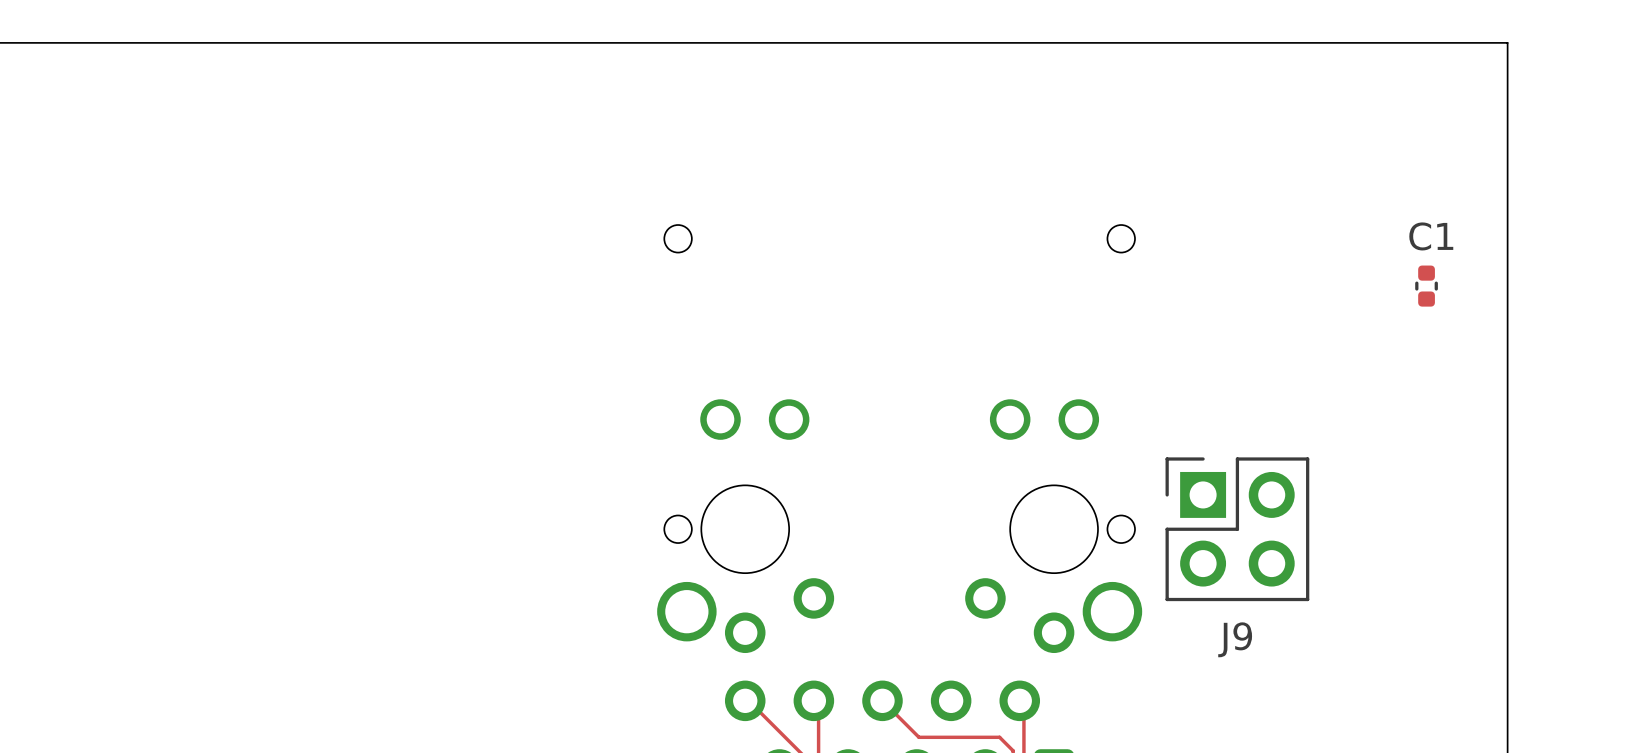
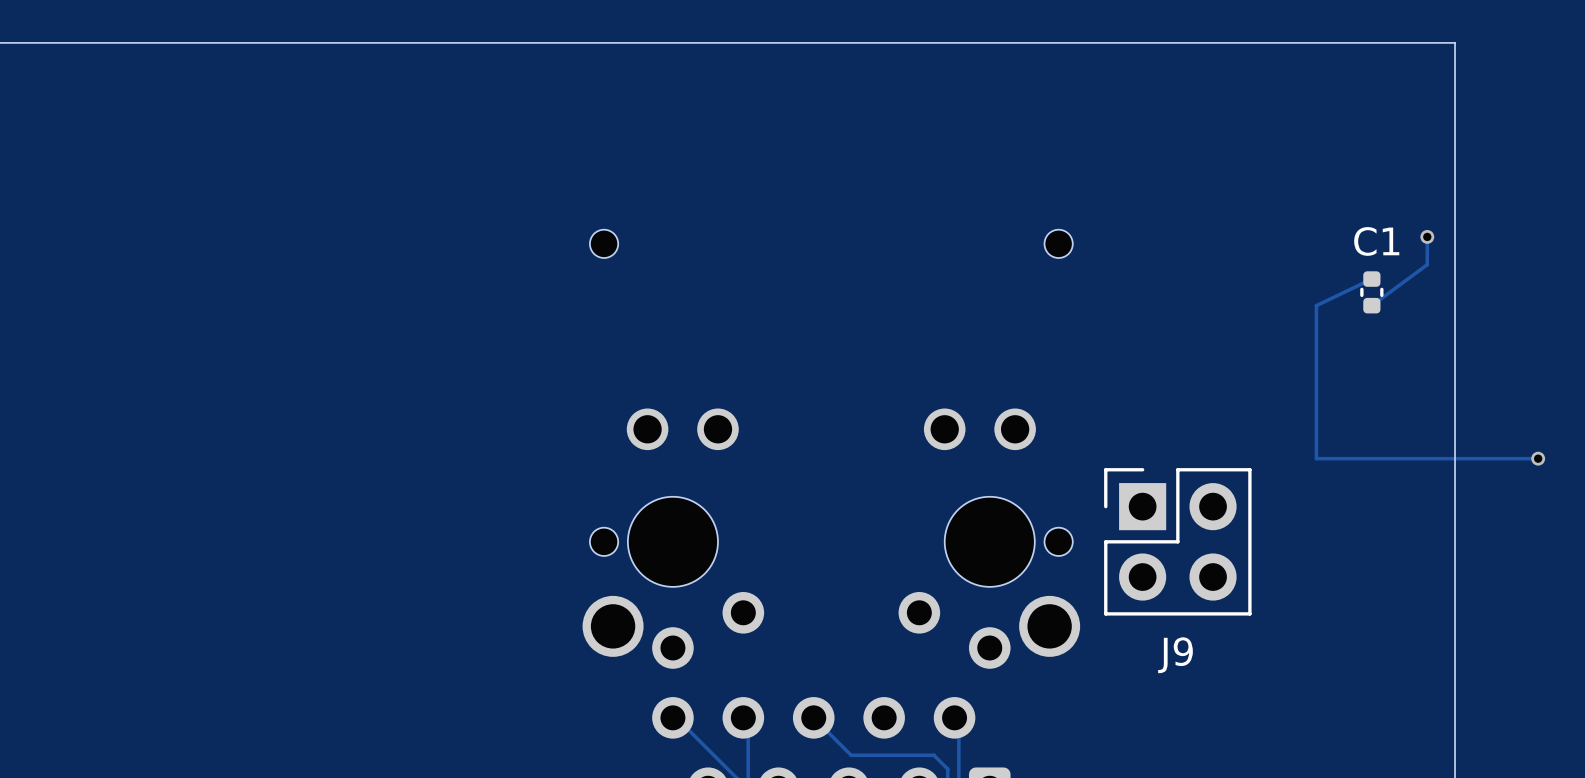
track: none -> (1427, 236) (1427, 264) (1371, 305)
via: none -> (1427, 236)
track: none -> (1371, 279) (1316, 305) (1316, 458) (1538, 458)
via: none -> (1538, 458)

